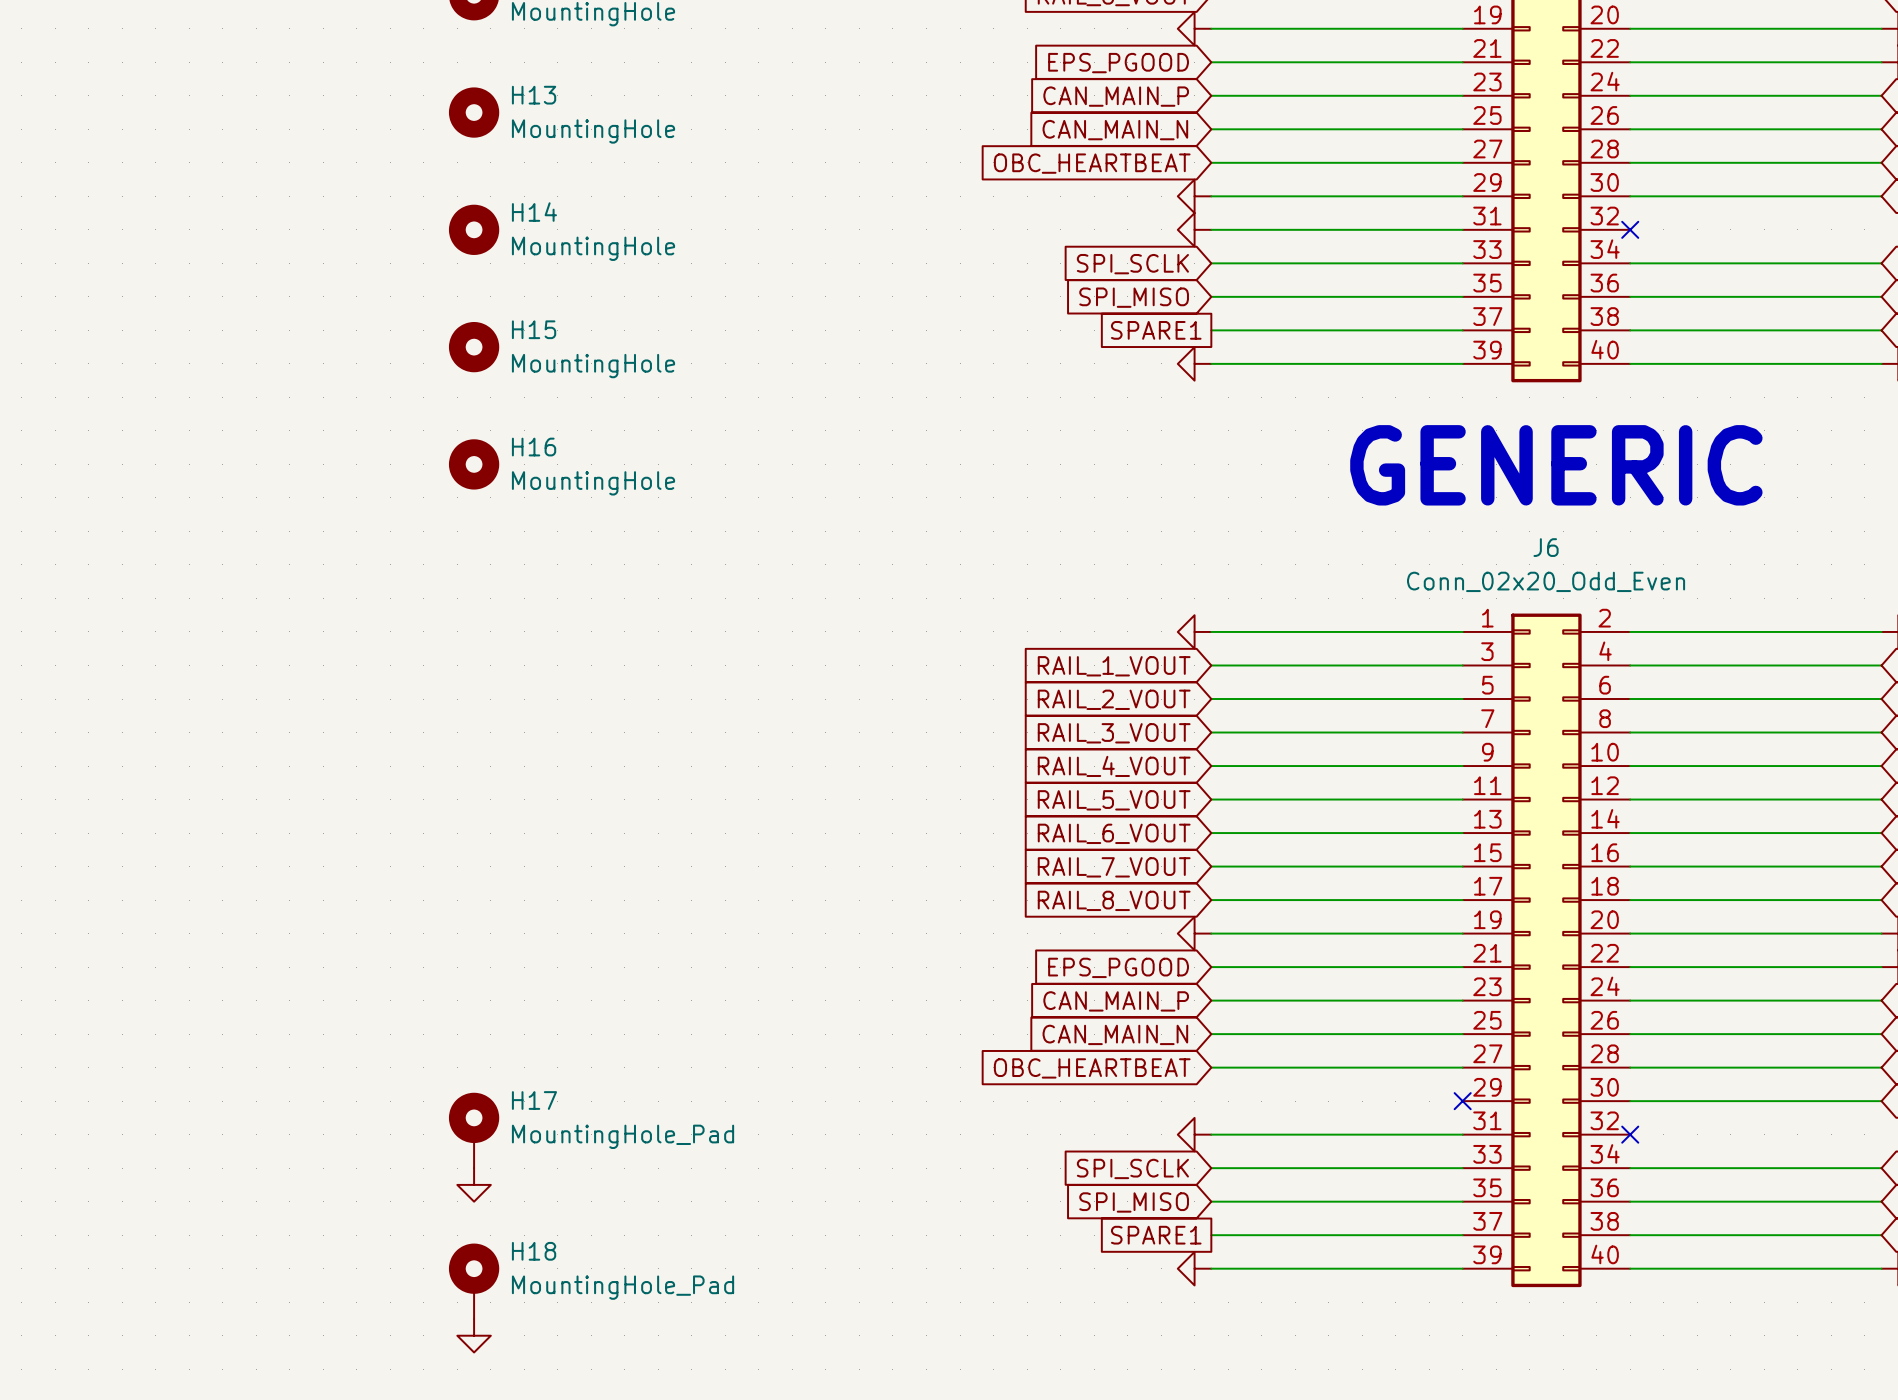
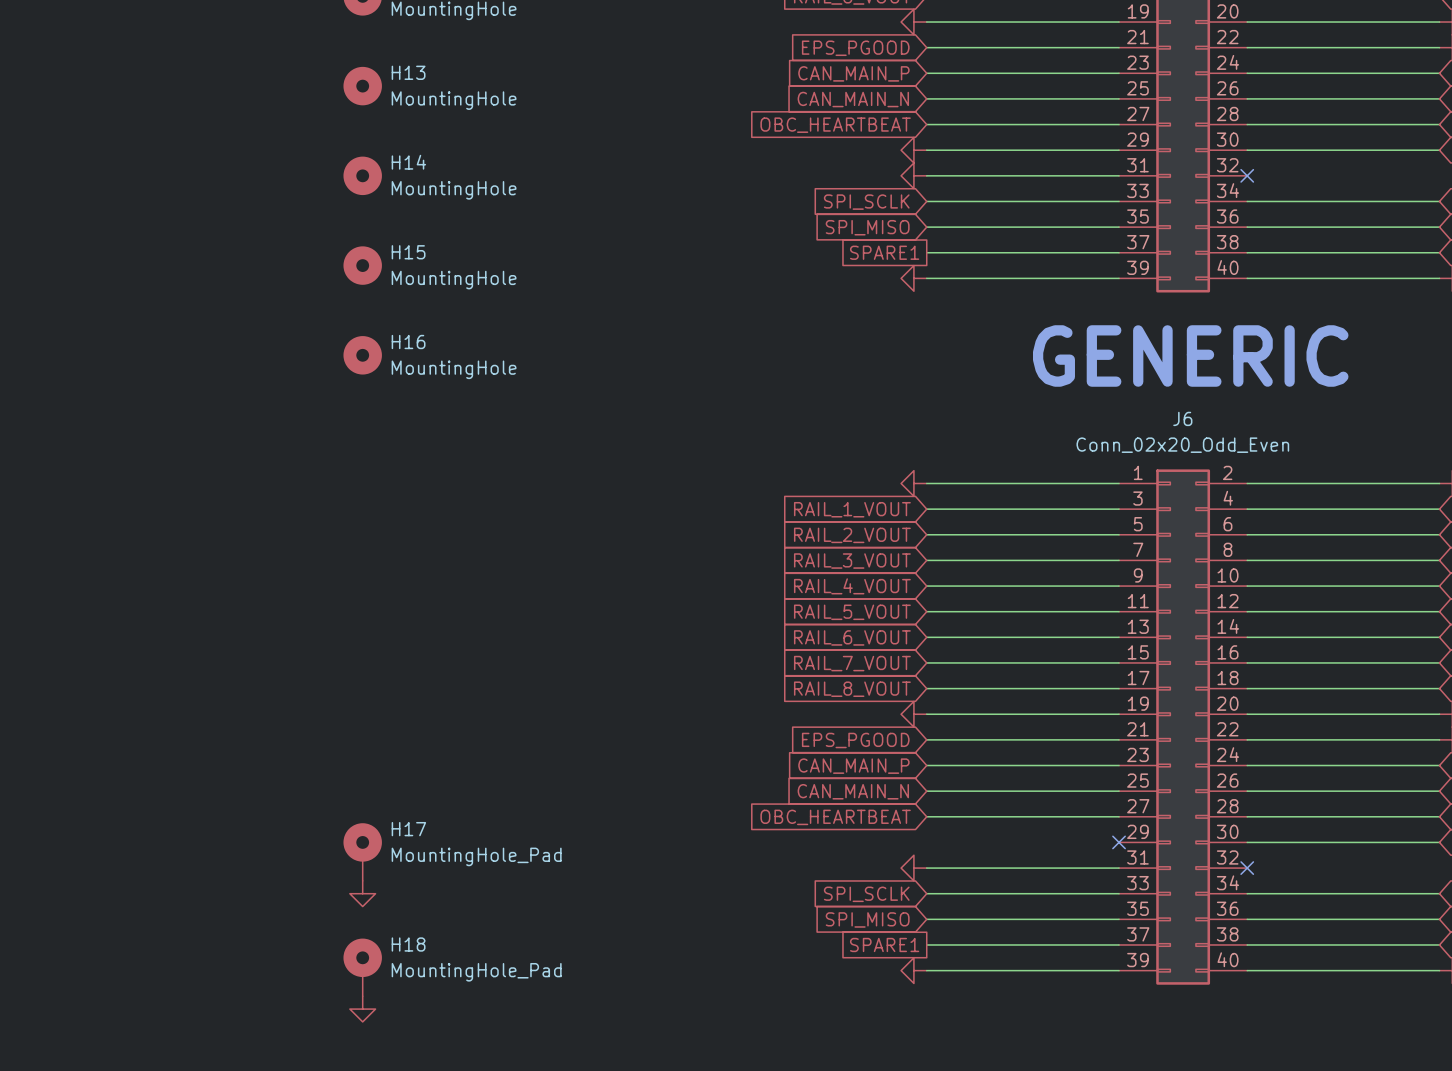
H17 position: (474, 1130) -> (362, 852)
power symbol position: (474, 1184) -> (362, 893)
H18 position: (474, 1281) -> (362, 967)
power symbol position: (474, 1335) -> (362, 1009)

